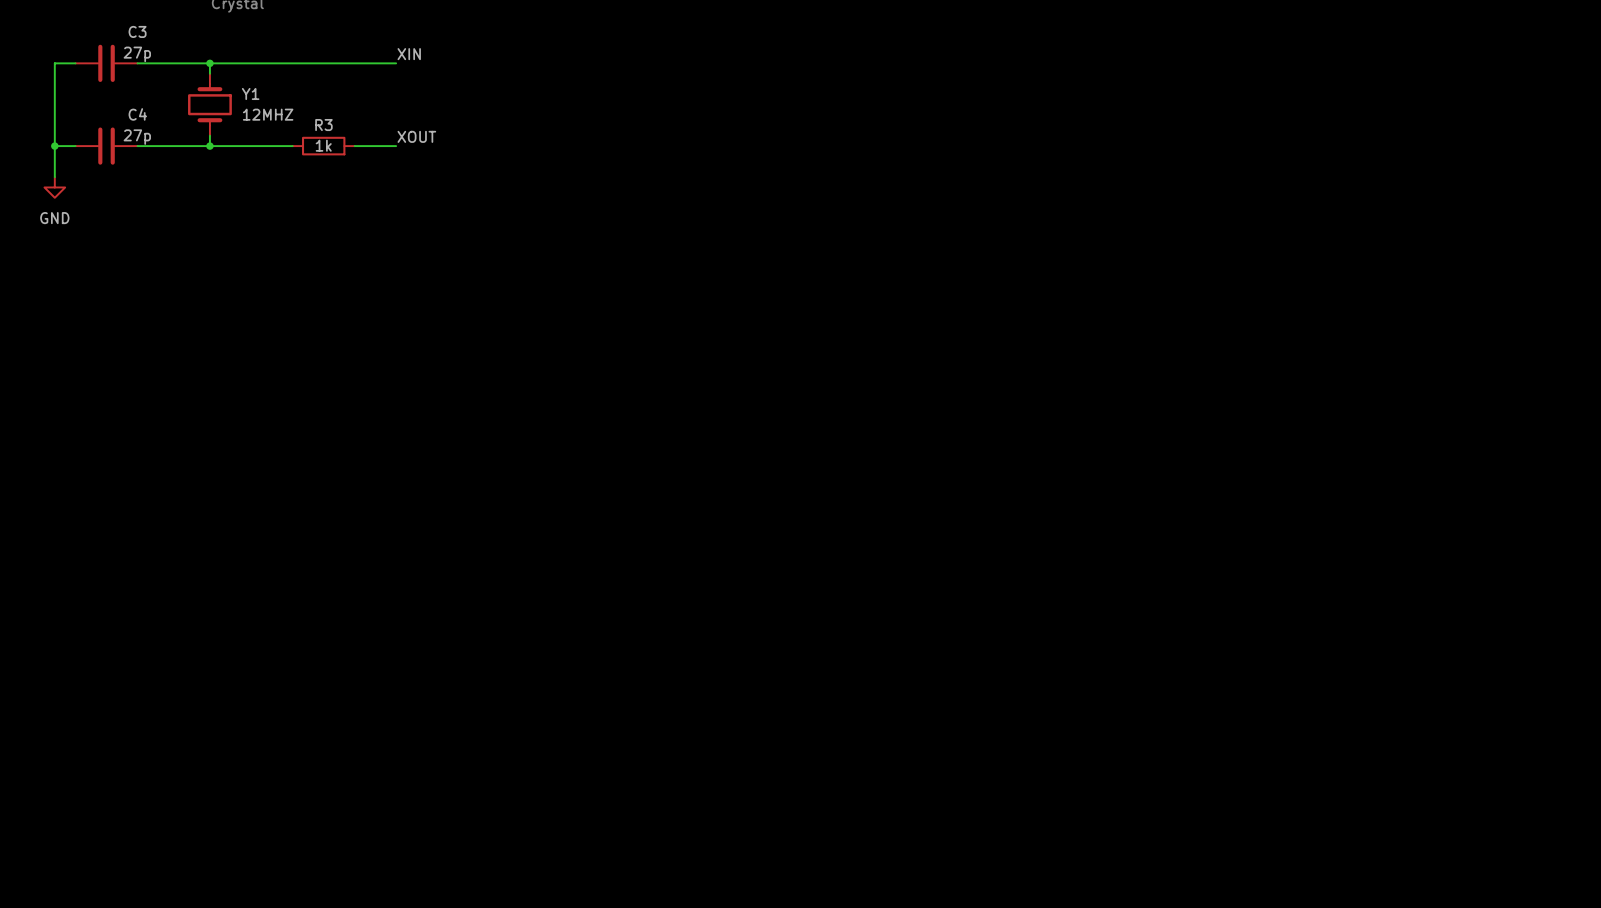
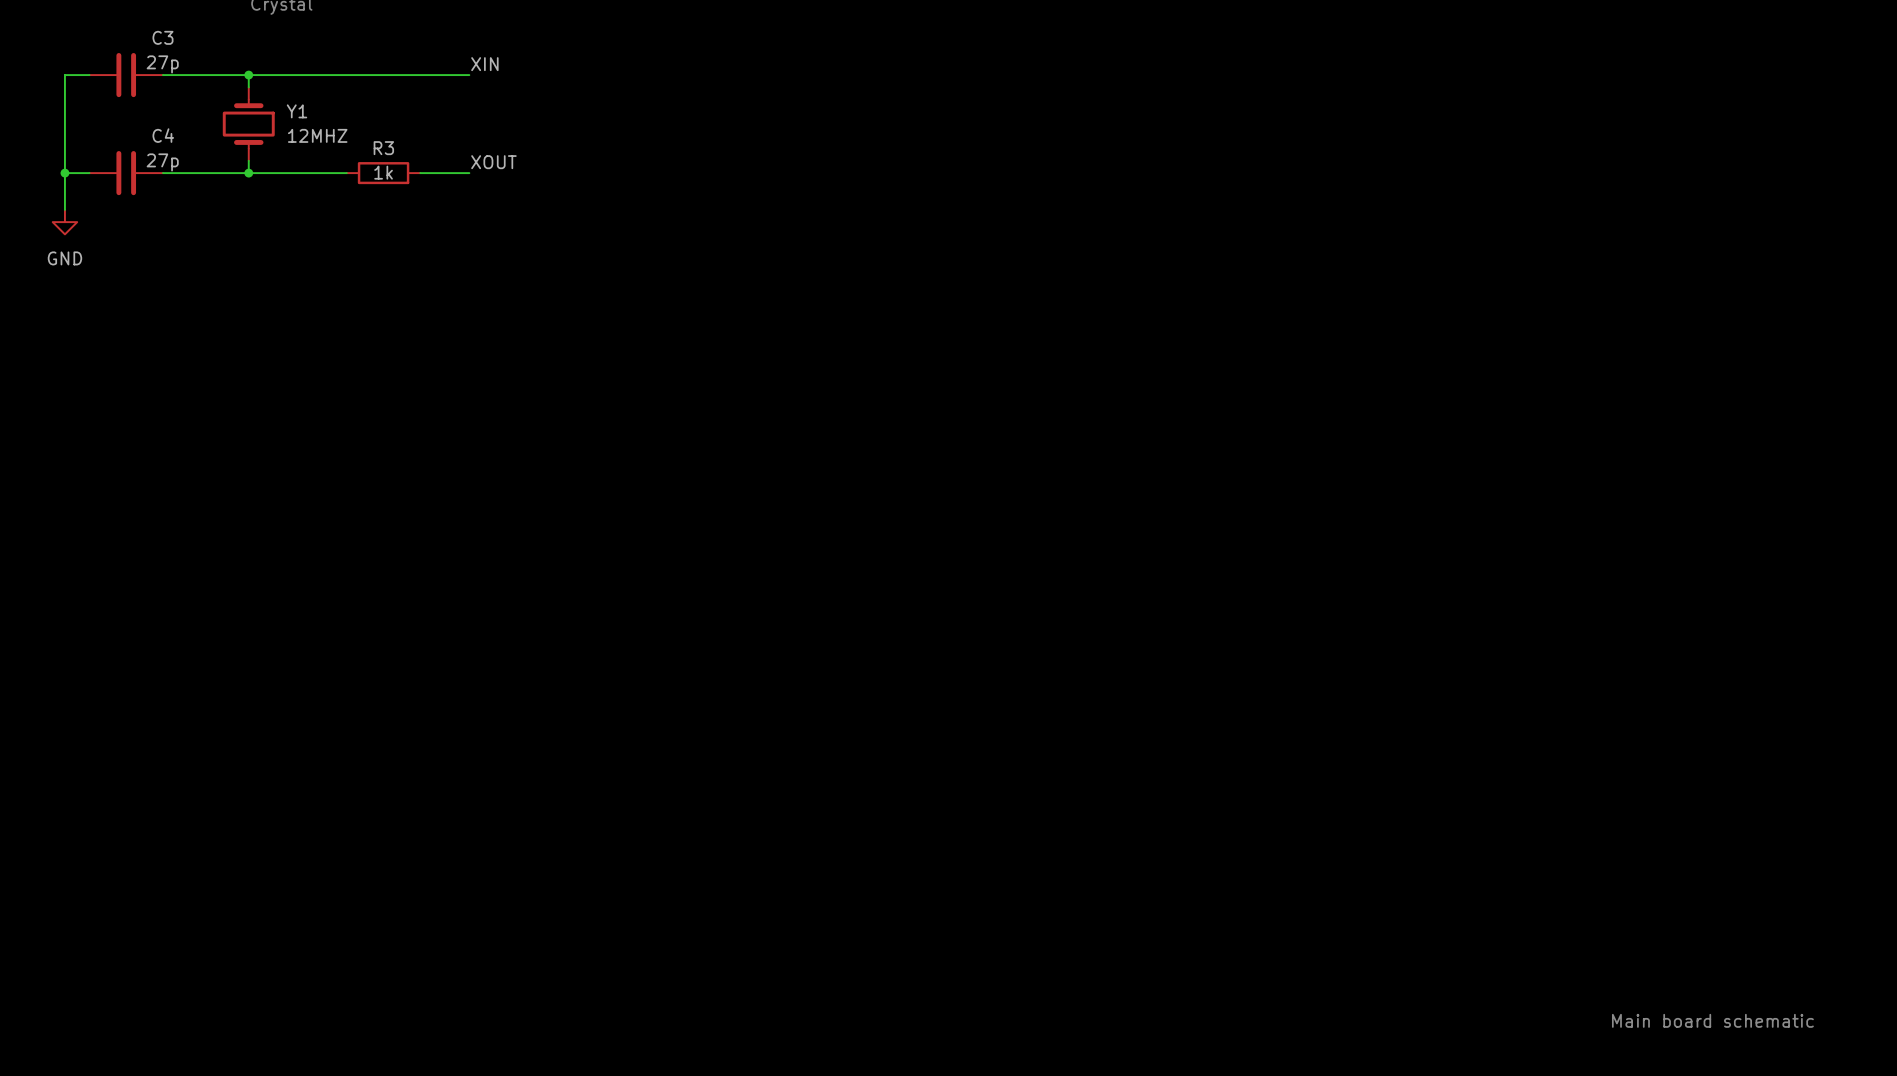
text: none -> Main board schematic (1712, 1020)

